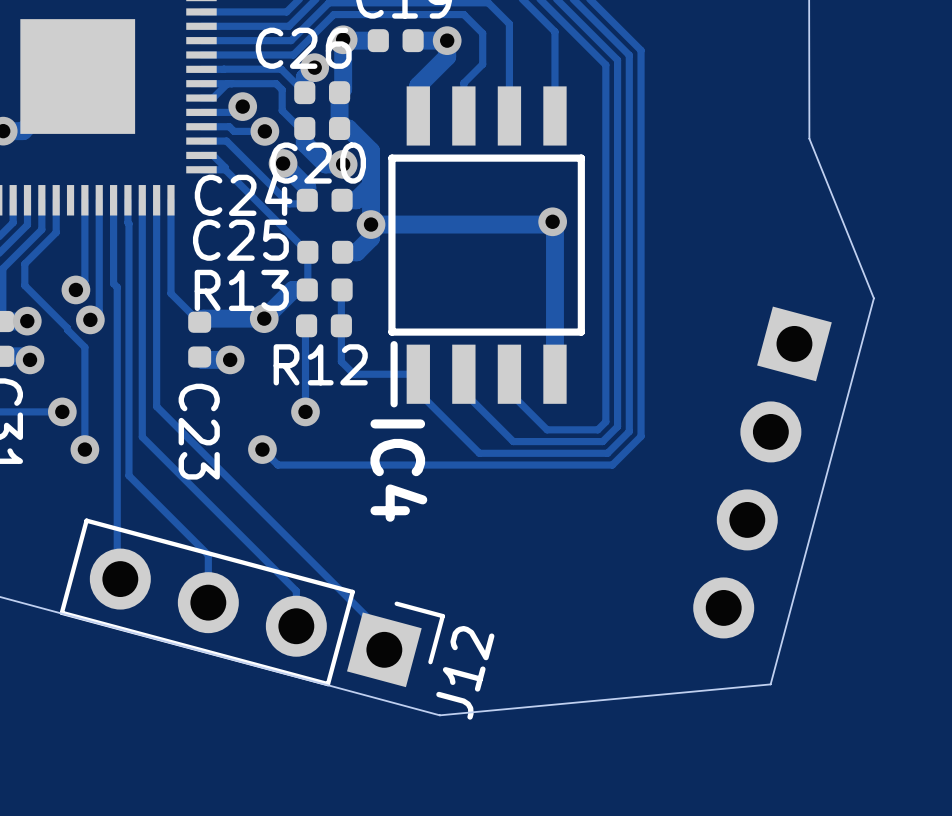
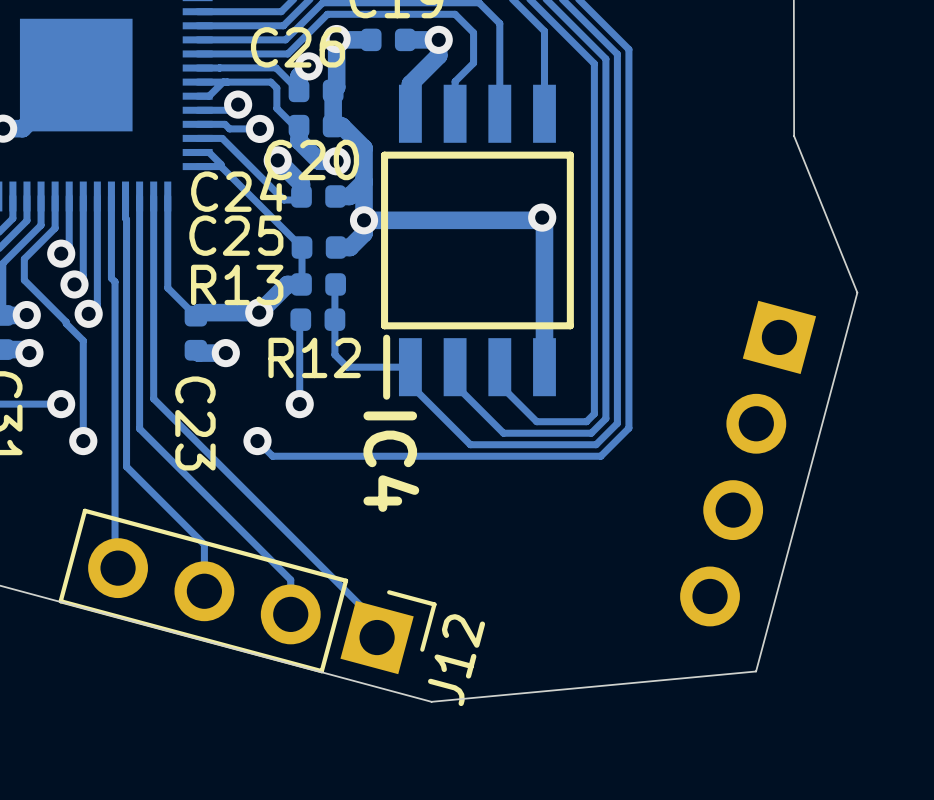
track: none -> (69, 196) (69, 245) (61, 253)
via: none -> (61, 253)

